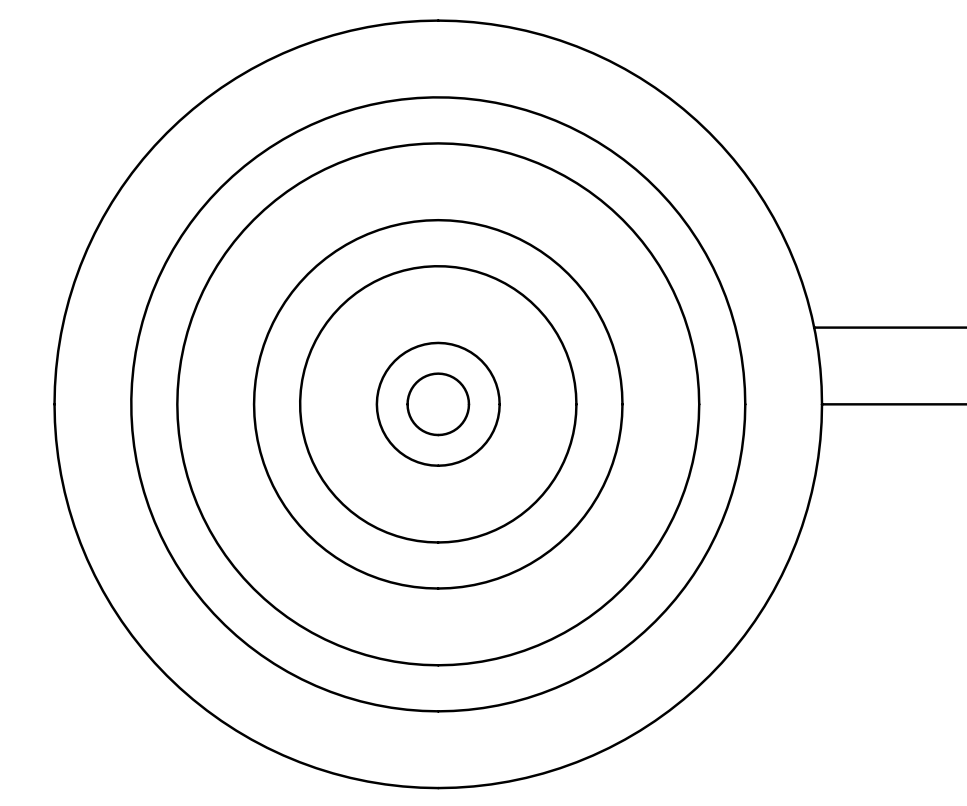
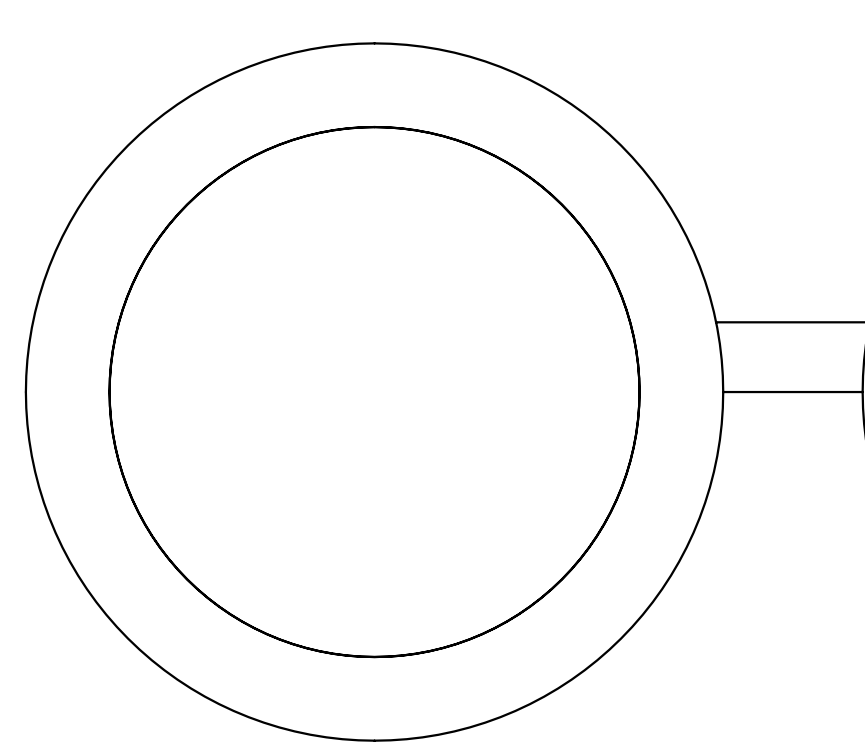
board edge: none -> (374, 127) (429, 132) (482, 149) (530, 177) (561, 204) (588, 236) (616, 284) (633, 336) (639, 392)
board edge: none -> (374, 127) (333, 130) (292, 140) (266, 149) (230, 169) (197, 195) (177, 214) (152, 247) (132, 284) (118, 323) (111, 364) (109, 405) (115, 447) (122, 473) (138, 512) (160, 547) (187, 579) (218, 606) (254, 628) (292, 644) (319, 651) (360, 656) (402, 655) (443, 647) (482, 634) (518, 614) (551, 588) (571, 569) (596, 536) (616, 499) (626, 473) (636, 433) (639, 392)
board edge: none -> (374, 127) (429, 132) (482, 149) (530, 177) (561, 204) (588, 236) (616, 284) (633, 336) (639, 392)
board edge: none -> (374, 127) (333, 130) (292, 140) (266, 149) (230, 169) (197, 195) (177, 214) (152, 247) (132, 284) (118, 323) (111, 364) (109, 405) (115, 447) (122, 473) (138, 512) (160, 547) (187, 579) (218, 606) (254, 628) (292, 644) (319, 651) (360, 656) (402, 655) (443, 647) (482, 634) (518, 614) (551, 588) (571, 569) (596, 536) (616, 499) (626, 473) (636, 433) (639, 392)
board edge: (468, 404) (466, 416) (459, 426) (450, 432) (438, 435) (426, 432) (416, 426) (409, 416) (407, 404) (409, 392) (416, 382) (426, 375) (438, 373) (450, 375) (459, 382) (466, 392) (468, 404) -> none
board edge: (499, 404) (498, 418) (493, 430) (481, 447) (464, 459) (451, 464) (438, 465) (424, 464) (411, 459) (394, 447) (382, 430) (378, 418) (376, 404) (378, 390) (382, 377) (394, 360) (411, 349) (424, 344) (438, 342) (451, 344) (464, 349) (481, 360) (493, 377) (498, 390) (499, 404) -> none
board edge: (576, 404) (573, 433) (563, 461) (548, 487) (535, 502) (521, 514) (495, 530) (467, 539) (438, 542) (417, 540) (387, 532) (368, 523) (343, 504) (322, 480) (308, 452) (301, 421) (300, 400) (304, 369) (315, 340) (326, 322) (348, 299) (374, 281) (393, 273) (424, 266) (445, 266) (476, 271) (495, 278) (522, 295) (538, 309) (557, 334) (566, 353) (574, 383) (576, 404) -> none
board edge: (622, 404) (618, 440) (608, 474) (591, 506) (568, 534) (540, 557) (508, 574) (474, 584) (438, 588) (402, 584) (367, 574) (335, 557) (308, 534) (285, 506) (268, 474) (257, 440) (254, 404) (257, 368) (268, 333) (285, 302) (308, 274) (335, 251) (367, 234) (402, 223) (438, 220) (474, 223) (508, 234) (540, 251) (568, 274) (591, 302) (608, 333) (618, 368) (622, 404) -> none
board edge: (699, 404) (695, 448) (689, 476) (679, 504) (666, 530) (651, 555) (622, 588) (589, 617) (564, 632) (538, 645) (510, 655) (481, 661) (438, 665) (394, 661) (366, 655) (338, 645) (312, 632) (287, 617) (253, 588) (225, 555) (209, 530) (197, 504) (187, 476) (181, 448) (177, 404) (181, 360) (187, 332) (197, 304) (209, 278) (225, 253) (253, 219) (287, 191) (312, 175) (338, 163) (366, 153) (394, 147) (438, 143) (481, 147) (510, 153) (538, 163) (564, 175) (589, 191) (622, 219) (651, 253) (666, 278) (679, 304) (689, 332) (695, 360) (699, 404) -> none
board edge: (745, 404) (739, 464) (721, 521) (693, 574) (655, 621) (608, 659) (555, 687) (498, 705) (438, 711) (406, 709) (375, 704) (345, 696) (315, 685) (274, 663) (248, 645) (224, 625) (203, 602) (184, 577) (168, 550) (154, 521) (144, 492) (136, 461) (132, 430) (131, 399) (133, 367) (138, 336) (147, 306) (158, 277) (173, 249) (190, 223) (210, 198) (232, 176) (256, 156) (283, 139) (311, 124) (340, 113) (386, 101) (417, 98) (448, 97) (480, 100) (510, 106) (541, 115) (570, 127) (611, 150) (636, 169) (659, 191) (679, 214) (697, 240) (719, 282) (730, 311) (738, 341) (743, 372) (745, 404) -> none

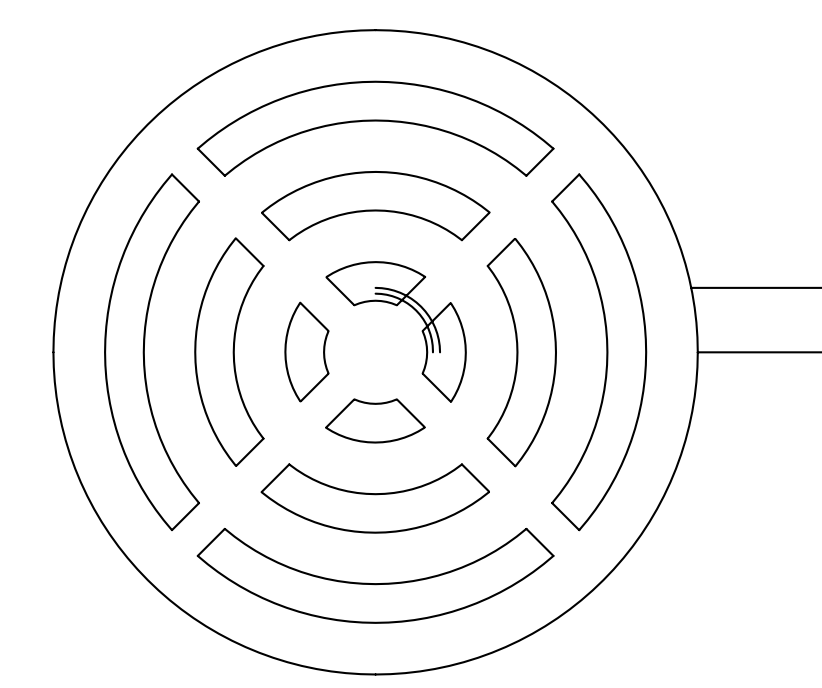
board edge: (374, 127) (429, 132) (482, 149) (530, 177) (561, 204) (588, 236) (616, 284) (633, 336) (639, 392) -> none
board edge: (374, 127) (333, 130) (292, 140) (266, 149) (230, 169) (197, 195) (177, 214) (152, 247) (132, 284) (118, 323) (111, 364) (109, 405) (115, 447) (122, 473) (138, 512) (160, 547) (187, 579) (218, 606) (254, 628) (292, 644) (319, 651) (360, 656) (402, 655) (443, 647) (482, 634) (518, 614) (551, 588) (571, 569) (596, 536) (616, 499) (626, 473) (636, 433) (639, 392) -> none
board edge: (374, 127) (429, 132) (482, 149) (530, 177) (561, 204) (588, 236) (616, 284) (633, 336) (639, 392) -> none
board edge: (374, 127) (333, 130) (292, 140) (266, 149) (230, 169) (197, 195) (177, 214) (152, 247) (132, 284) (118, 323) (111, 364) (109, 405) (115, 447) (122, 473) (138, 512) (160, 547) (187, 579) (218, 606) (254, 628) (292, 644) (319, 651) (360, 656) (402, 655) (443, 647) (482, 634) (518, 614) (551, 588) (571, 569) (596, 536) (616, 499) (626, 473) (636, 433) (639, 392) -> none
board edge: none -> (553, 148) (526, 175) (495, 153) (449, 132) (413, 123) (375, 120) (337, 123) (301, 132) (255, 153) (224, 175) (197, 148) (239, 118) (286, 96) (324, 86) (375, 81) (427, 86) (464, 96) (511, 118) (553, 148)
board edge: none -> (172, 174) (199, 201) (177, 232) (155, 277) (146, 314) (143, 352) (146, 389) (155, 426) (177, 472) (199, 503) (172, 530) (141, 488) (120, 441) (110, 403) (105, 352) (110, 300) (120, 263) (141, 216) (172, 174)
board edge: none -> (579, 174) (552, 201) (574, 232) (595, 277) (604, 314) (607, 352) (604, 389) (595, 426) (574, 472) (552, 503) (579, 530) (609, 488) (631, 441) (641, 403) (646, 352) (641, 300) (631, 263) (609, 216) (579, 174)
board edge: none -> (489, 212) (464, 195) (436, 182) (406, 174) (375, 171) (345, 174) (315, 182) (287, 195) (262, 212)
board edge: none -> (489, 213) (461, 240) (438, 225) (421, 218) (394, 211) (375, 210) (357, 211) (329, 218) (312, 225) (289, 240) (262, 213)
board edge: none -> (235, 238) (218, 263) (205, 291) (197, 321) (195, 351) (197, 382) (205, 412) (218, 440) (235, 465)
board edge: none -> (236, 238) (263, 265) (248, 289) (241, 306) (235, 333) (233, 352) (235, 370) (241, 397) (248, 415) (263, 438) (236, 465)
board edge: none -> (515, 238) (532, 264) (545, 292) (553, 322) (555, 352) (553, 383) (545, 413) (532, 440) (515, 466)
board edge: none -> (514, 238) (487, 265) (502, 289) (509, 306) (516, 333) (517, 352) (516, 370) (509, 397) (502, 415) (487, 438) (514, 465)
board edge: none -> (425, 276) (398, 264) (375, 262) (353, 264) (326, 276)
board edge: none -> (326, 277) (353, 304)
board edge: none -> (424, 277) (397, 304)
board edge: none -> (375, 287) (400, 292) (421, 306) (435, 327) (440, 352)
board edge: none -> (375, 293) (397, 298) (416, 310) (428, 329) (432, 352)
board edge: none -> (300, 302) (288, 329) (285, 352) (288, 374) (300, 401)
board edge: none -> (300, 303) (327, 330)
board edge: none -> (450, 303) (423, 330)
board edge: none -> (451, 303) (463, 330) (465, 352) (463, 374) (451, 401)
board edge: none -> (396, 305) (375, 300) (354, 305)
board edge: none -> (328, 331) (324, 352) (328, 373)
board edge: none -> (422, 331) (427, 352) (422, 373)
board edge: none -> (327, 374) (300, 401)
board edge: none -> (423, 374) (450, 401)
board edge: none -> (396, 399) (375, 403) (354, 399)
board edge: none -> (353, 400) (326, 427)
board edge: none -> (397, 400) (424, 427)
board edge: none -> (424, 427) (397, 439) (375, 442) (353, 439) (326, 427)
board edge: none -> (489, 491) (461, 464) (438, 479) (421, 486) (394, 492) (375, 494) (357, 492) (329, 486) (312, 479) (289, 464) (262, 491)
board edge: none -> (489, 492) (463, 509) (435, 522) (405, 530) (375, 532) (344, 530) (314, 522) (286, 509) (261, 492)
board edge: none -> (526, 528) (553, 555) (533, 572) (500, 592) (464, 607) (427, 617) (401, 621) (349, 621) (324, 617) (286, 607) (239, 586) (197, 555) (224, 528) (255, 550) (301, 571) (350, 582) (400, 582) (437, 575) (473, 562) (495, 550) (526, 528)

